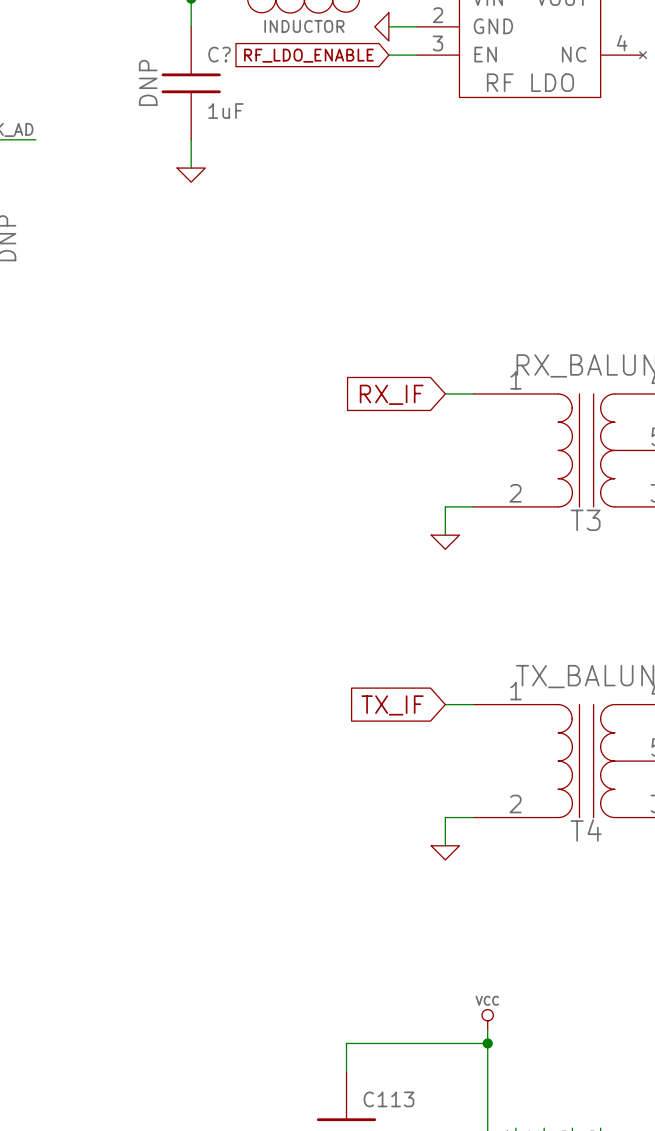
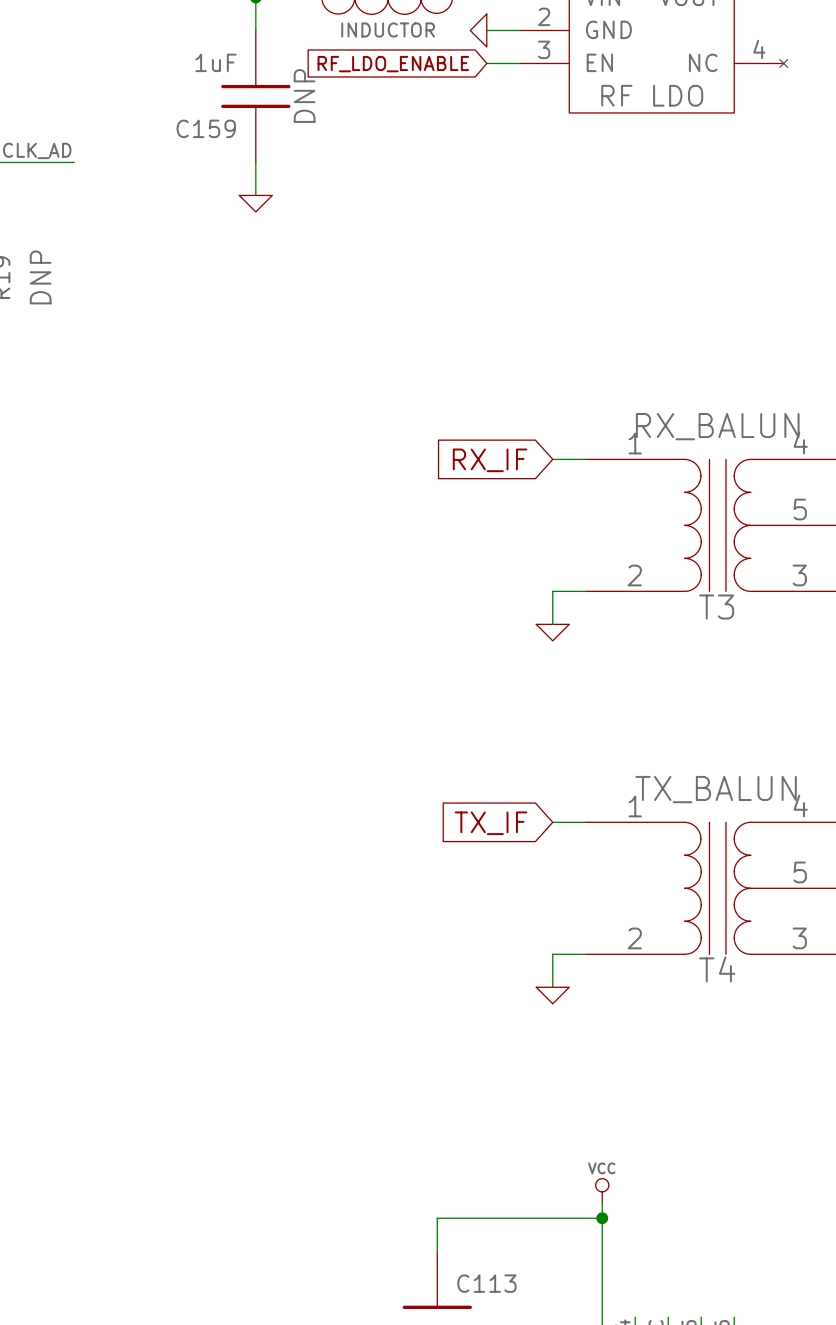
C? name: C? (219, 54) -> C159 (206, 128)
C? text position: DNP (148, 82) -> DNP (304, 96)
C? value position: 1uF (225, 111) -> 1uF (216, 62)

